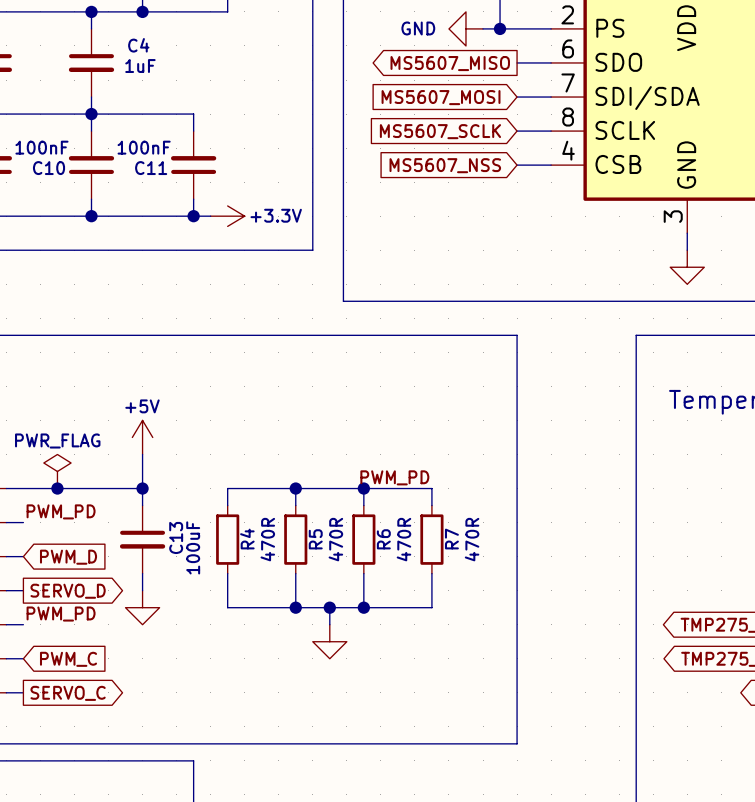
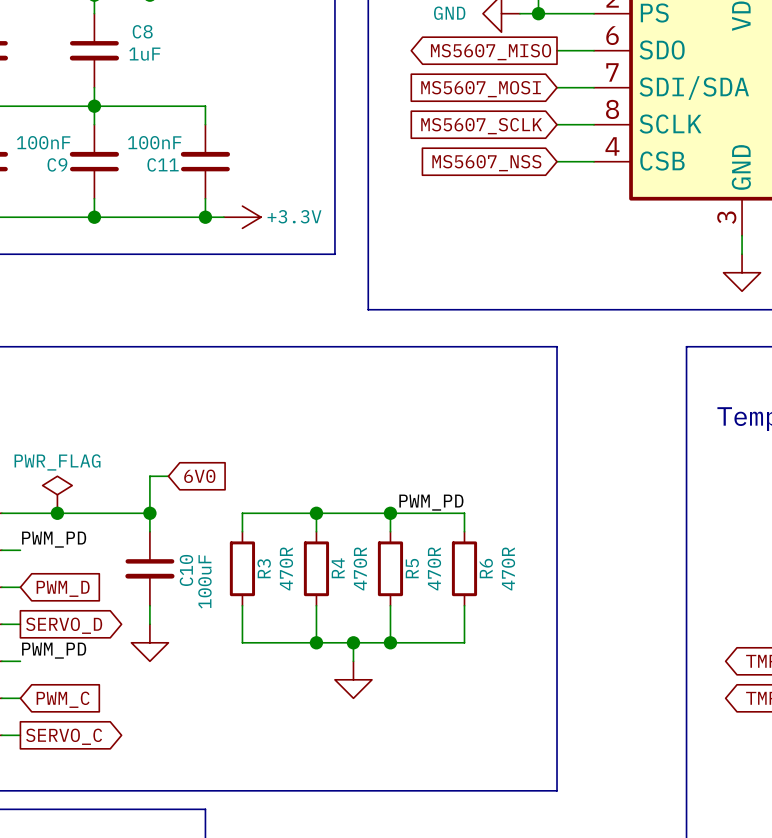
C4 name: C4 (138, 45) -> C8 (142, 31)
C10 name: C10 (49, 168) -> C9 (57, 164)
power symbol: +5V (142, 437) -> none
wire: none -> (149, 476) (168, 476)
global label: none -> 6V0 (199, 476)
C13 name: C13 (176, 537) -> C10 (186, 570)
R4 name: R4 (247, 539) -> R3 (264, 568)
R5 name: R5 (315, 539) -> R4 (338, 568)
R6 name: R6 (383, 539) -> R5 (412, 568)
R7 name: R7 (451, 539) -> R6 (486, 568)

